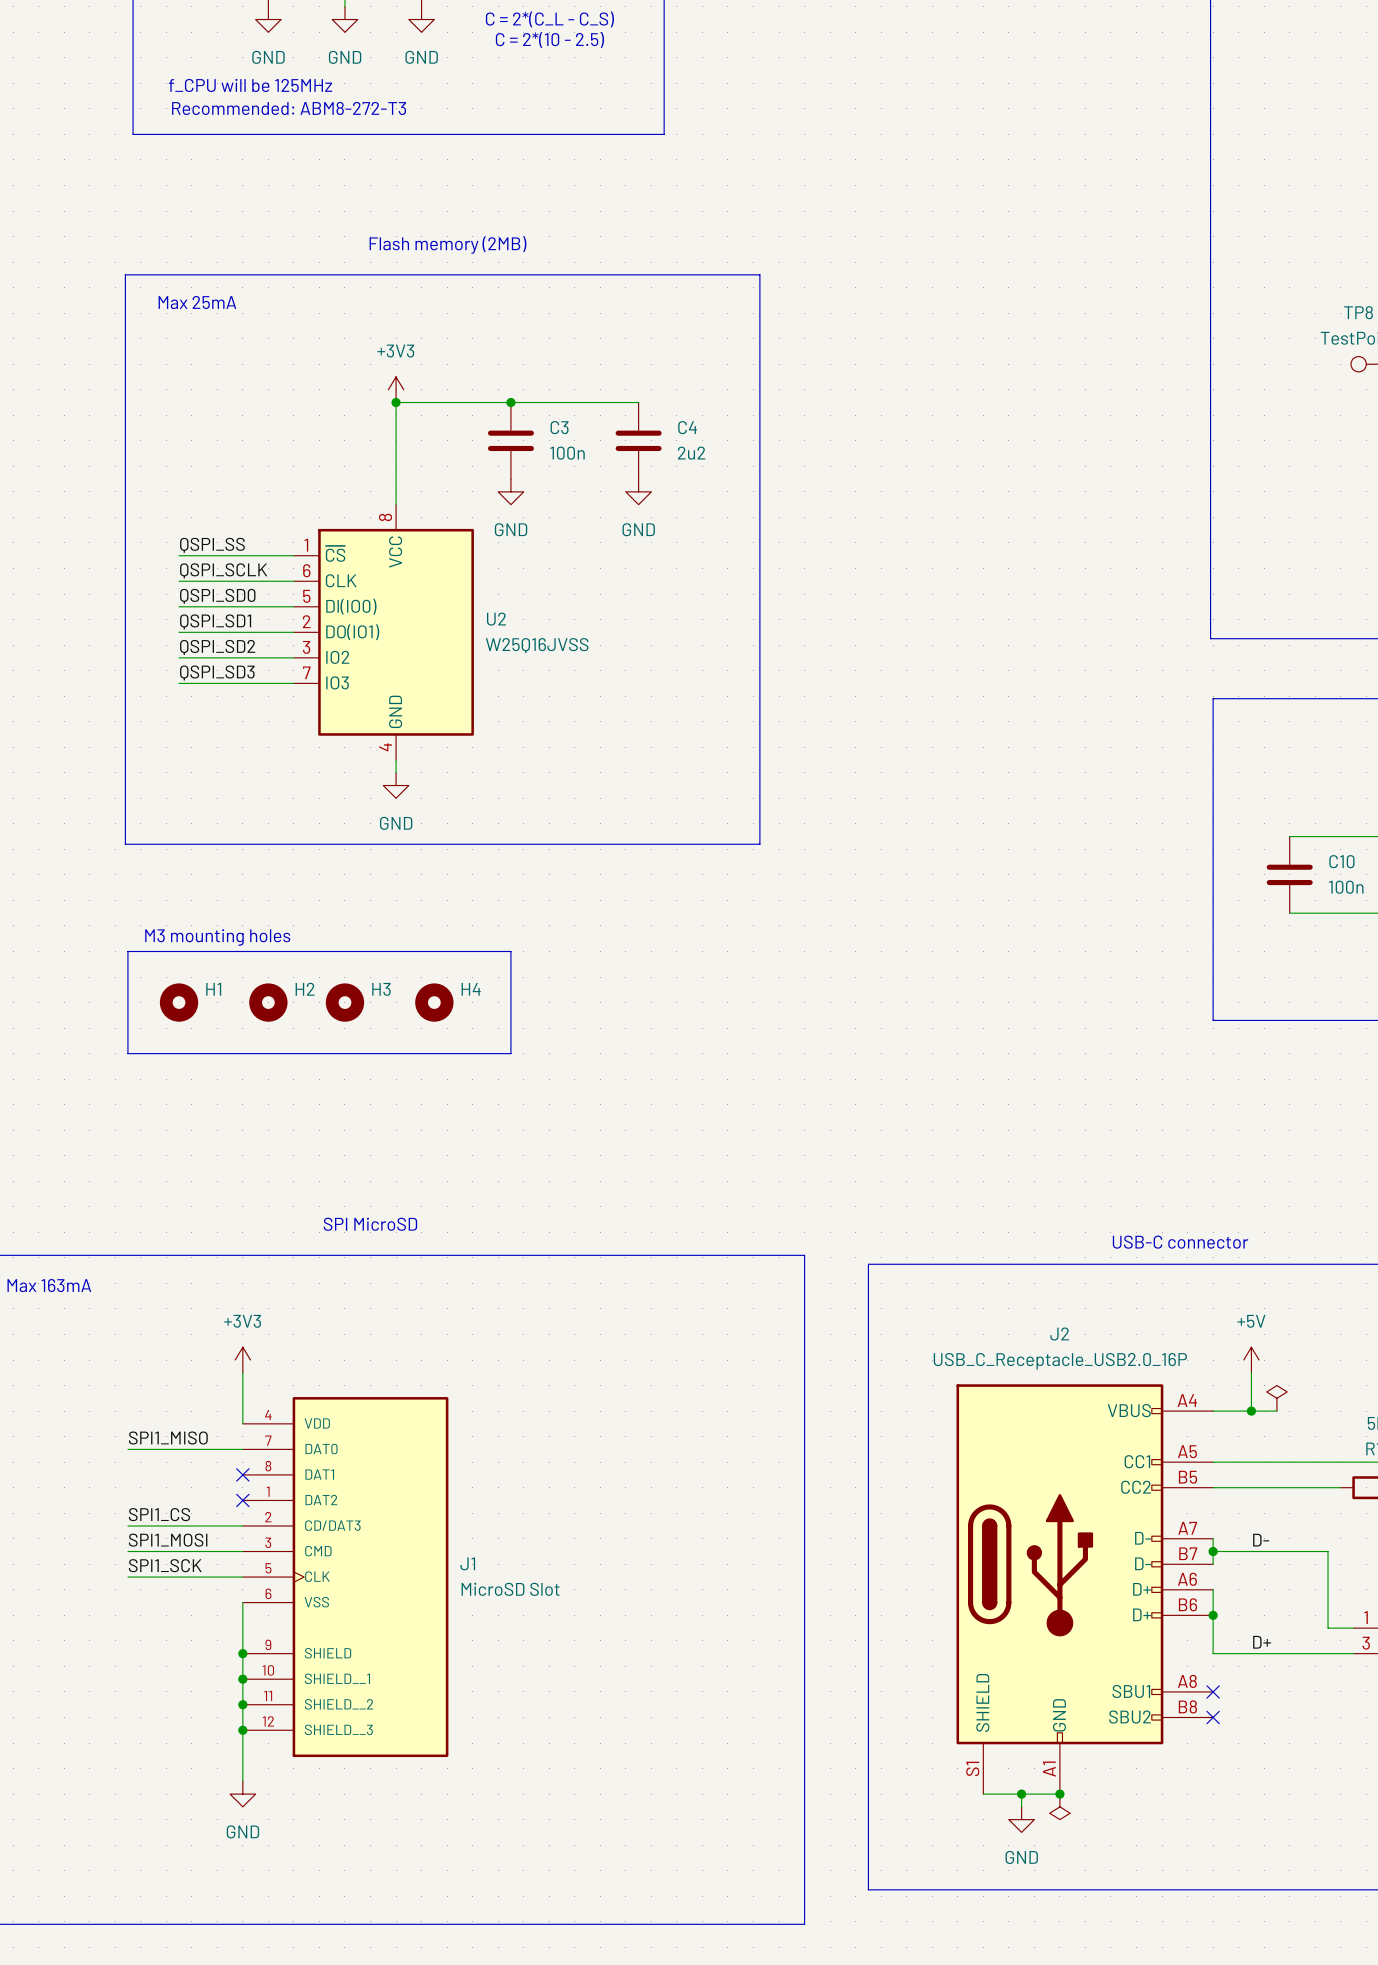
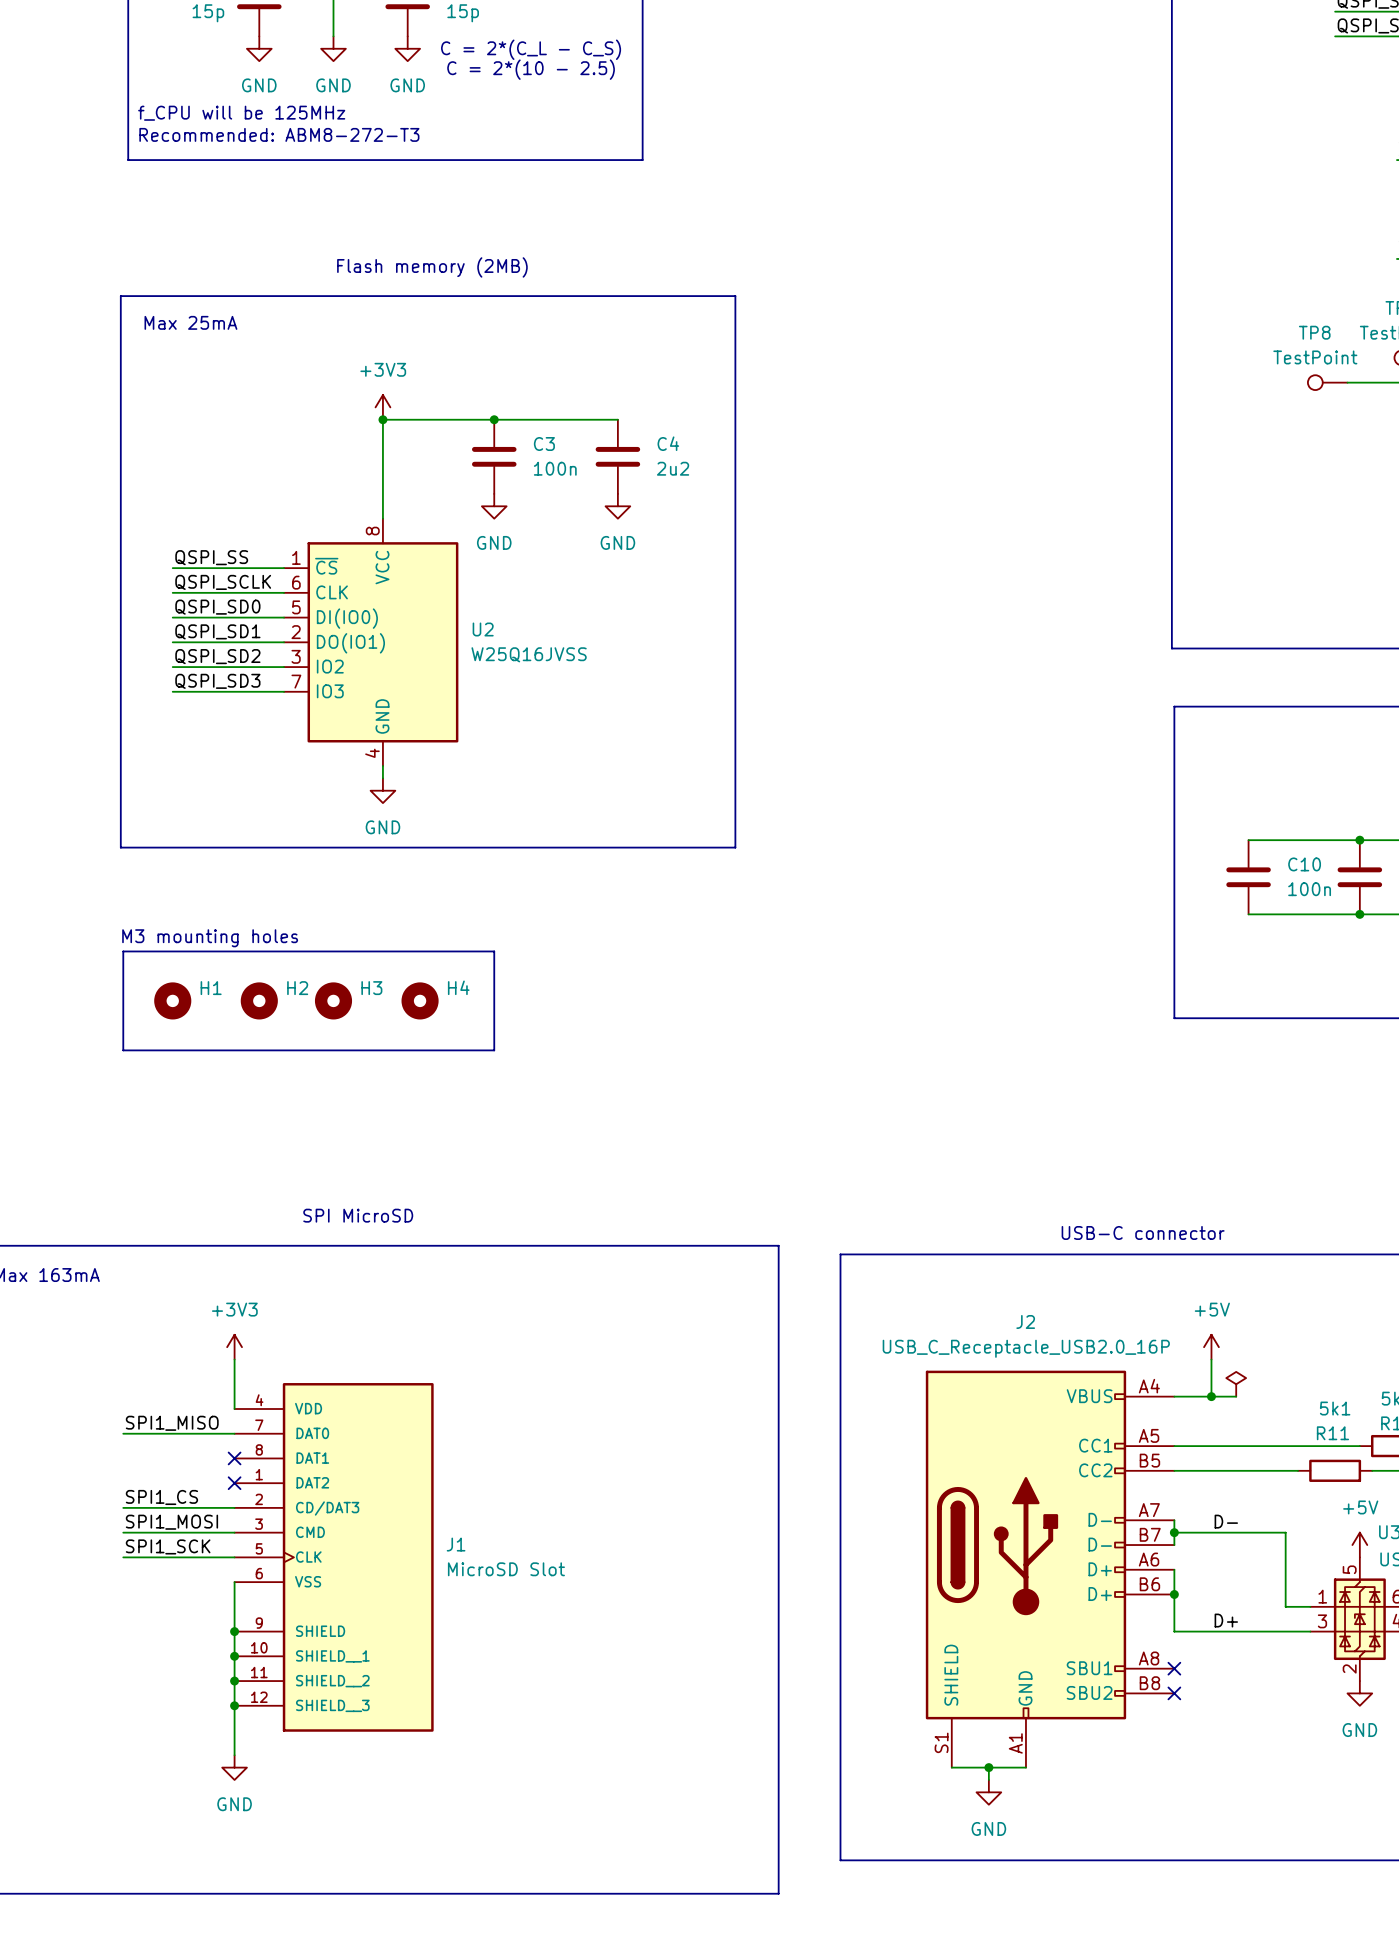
junction: (1059, 1794) -> none
power symbol: (1059, 1806) -> none

